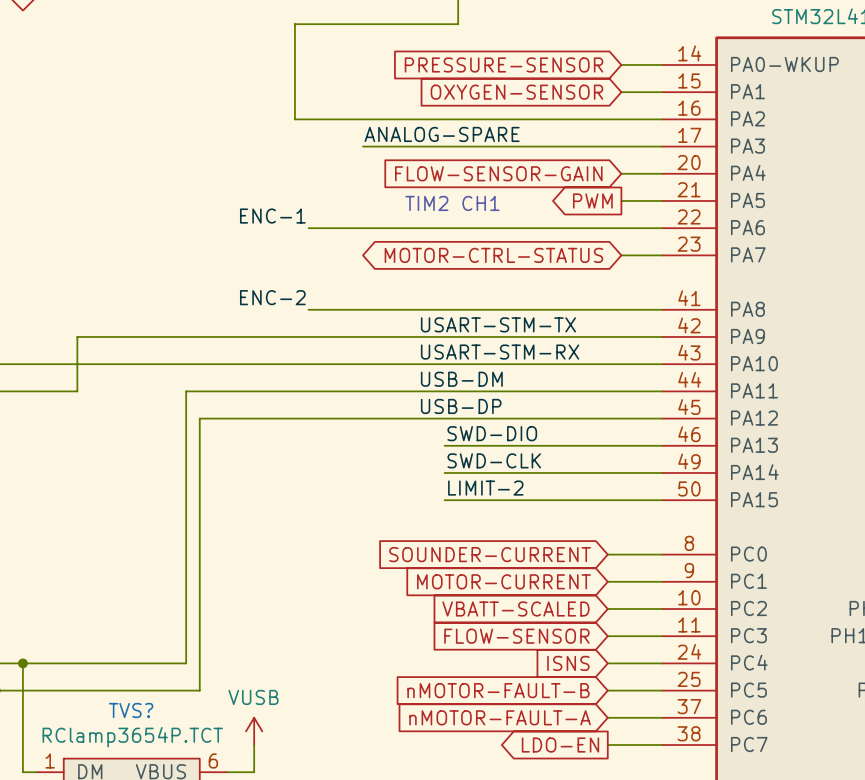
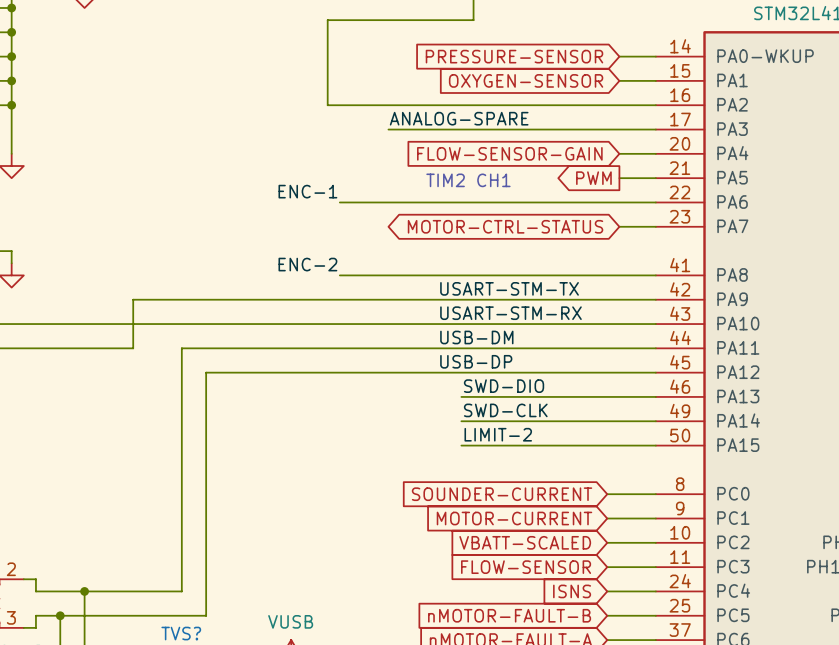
wire: (186, 391) (186, 663) (131, 663) -> (230, 348) (181, 348) (181, 591)
wire: (199, 418) (199, 690) (158, 690) -> (242, 372) (206, 372) (206, 615)

